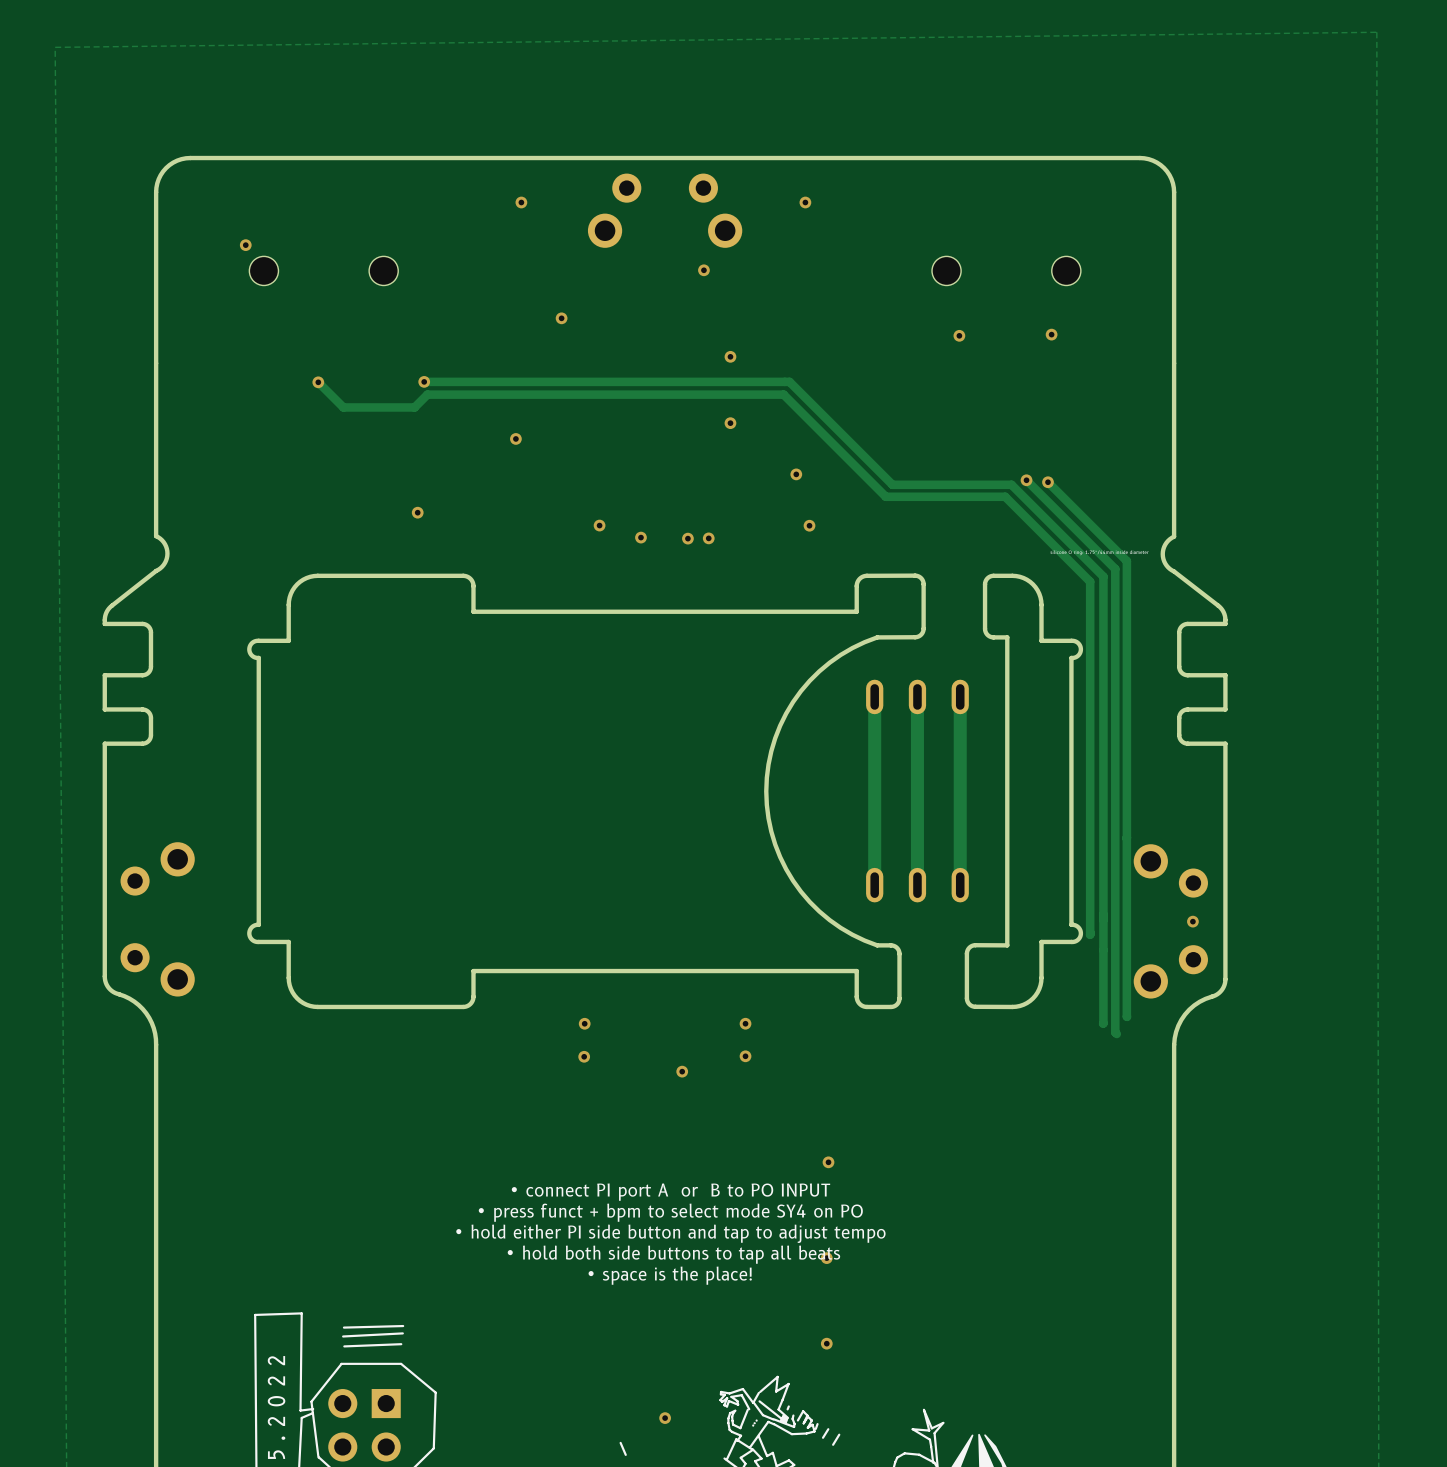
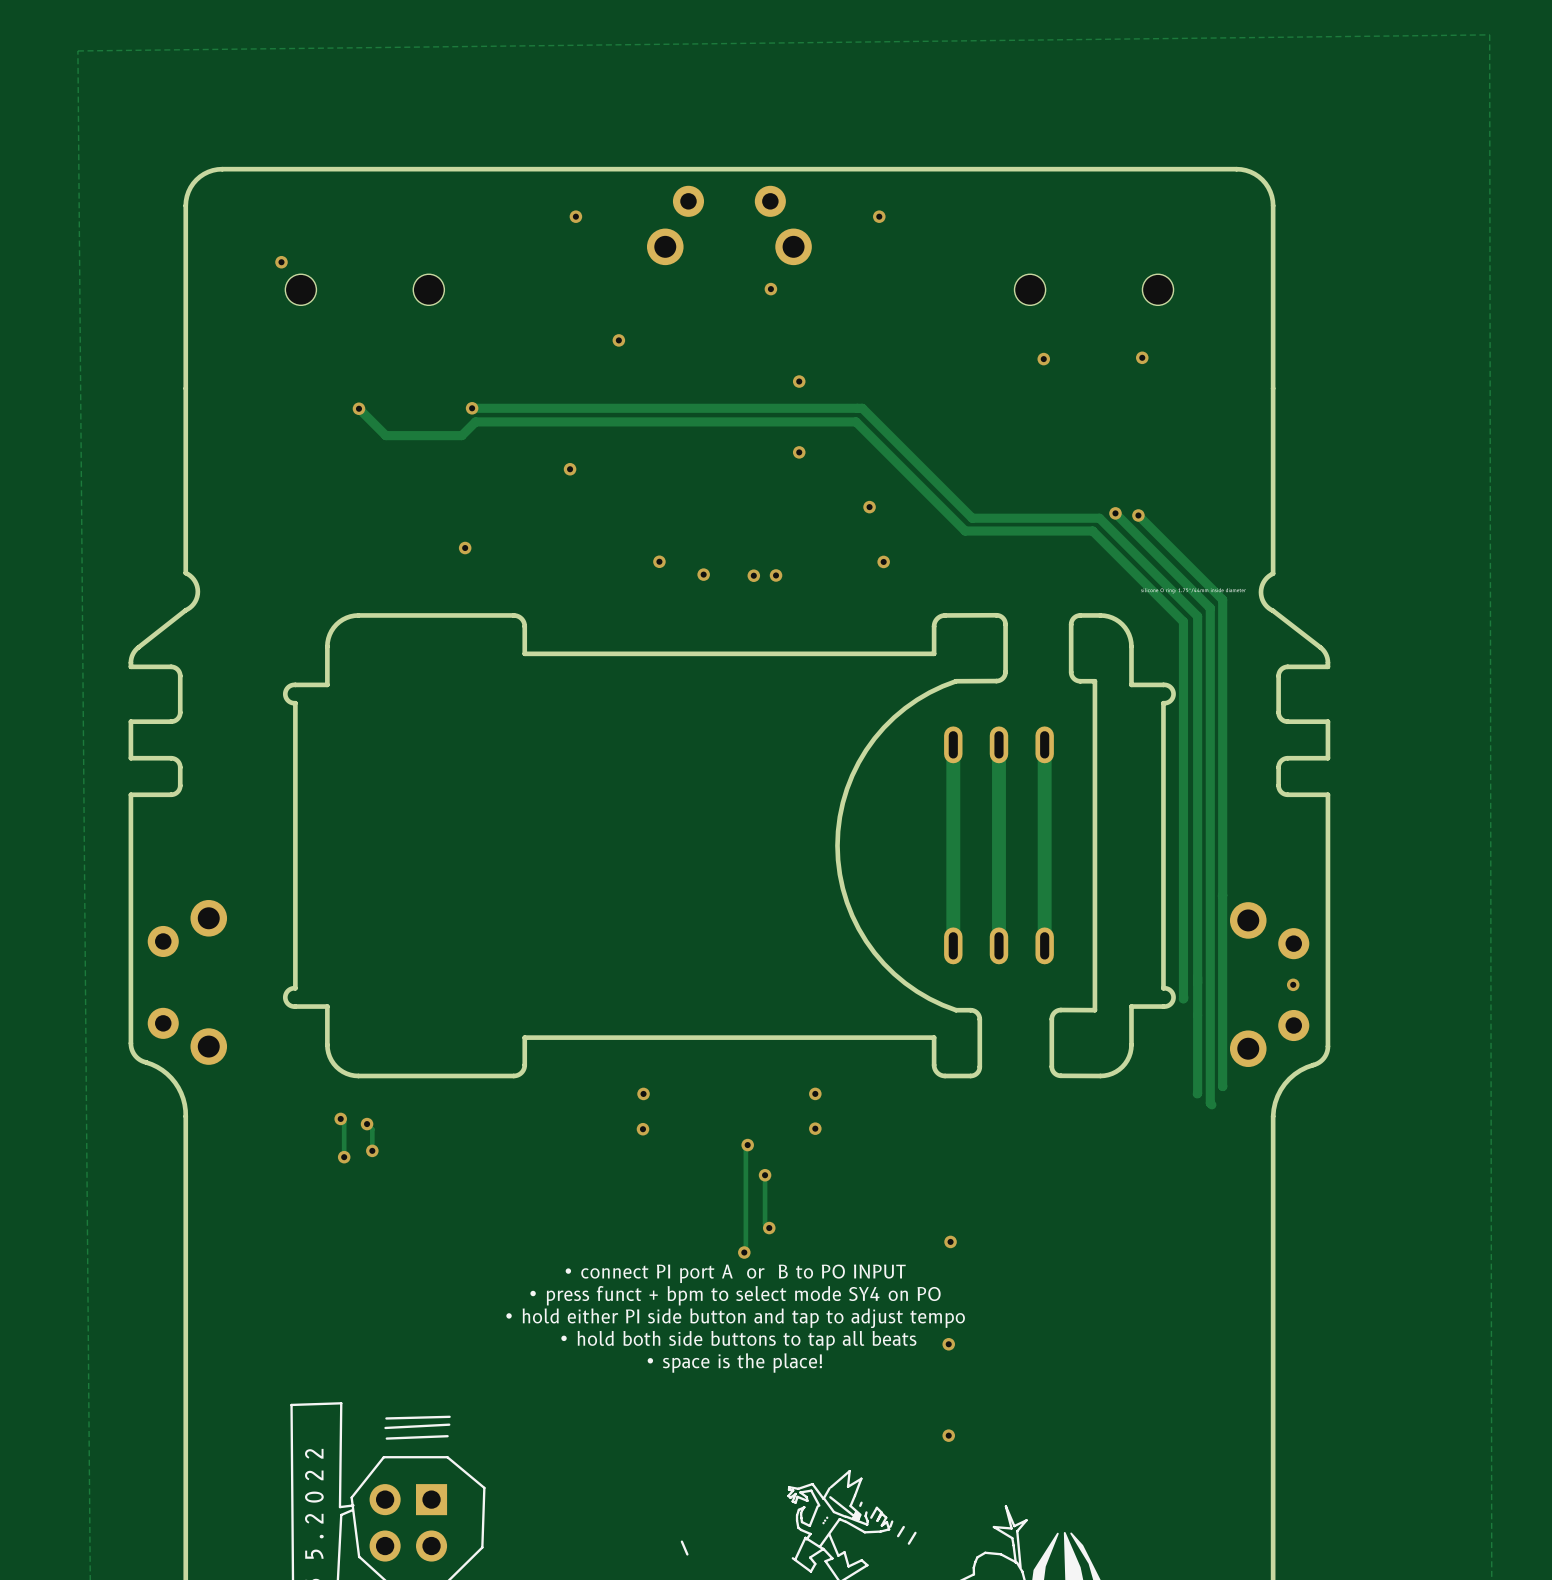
track: none -> (340, 1118) (344, 1122) (344, 1157)
via: none -> (340, 1118)
track: none -> (367, 1124) (372, 1129) (372, 1150)
via: none -> (367, 1124)
track: none -> (745, 1146) (745, 1251)
via: none -> (372, 1150)
via: none -> (344, 1157)
track: none -> (765, 1175) (765, 1223) (769, 1228)
via: none -> (765, 1175)
via: none -> (769, 1228)
via position: (828, 1162) -> (950, 1241)
via: none -> (744, 1252)
via position: (826, 1258) -> (948, 1344)
via position: (826, 1343) -> (948, 1435)
via: (665, 1418) -> none

